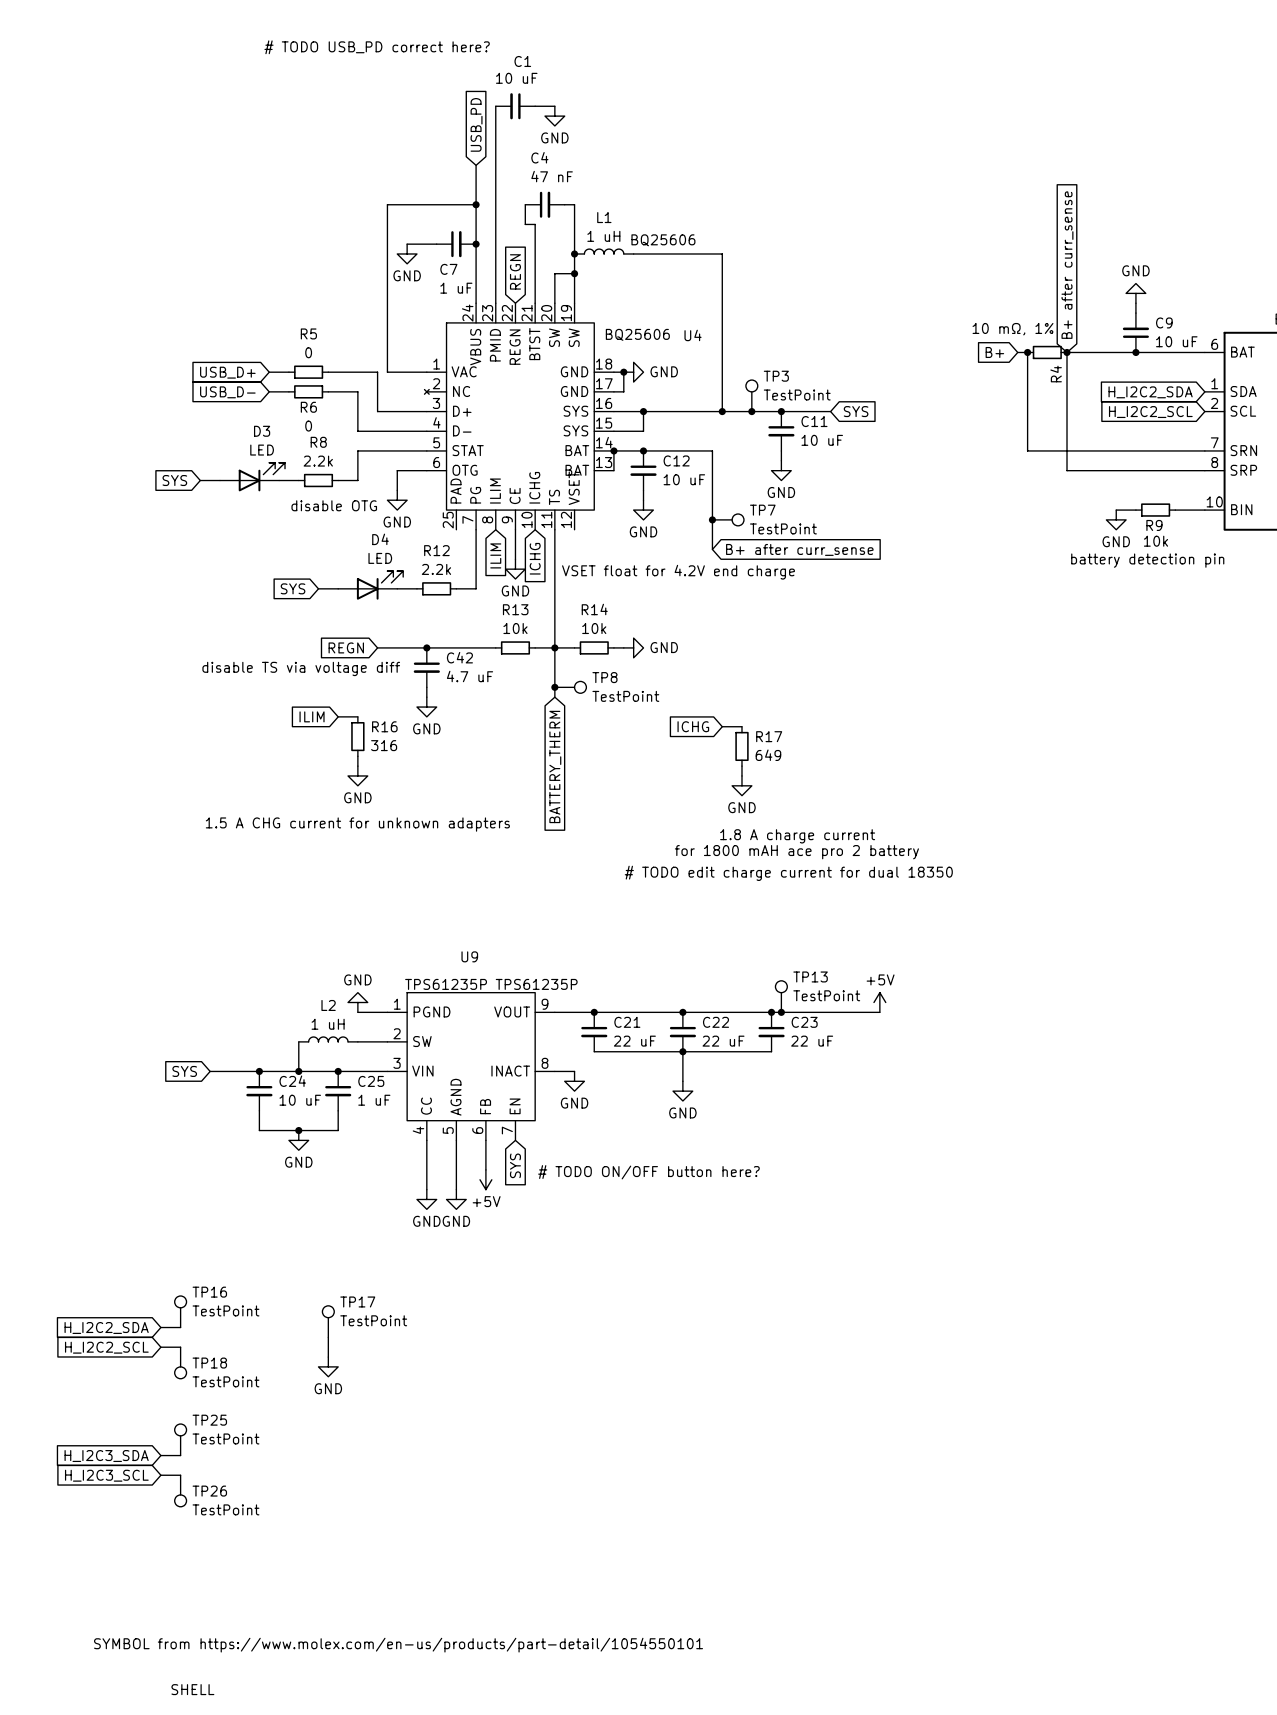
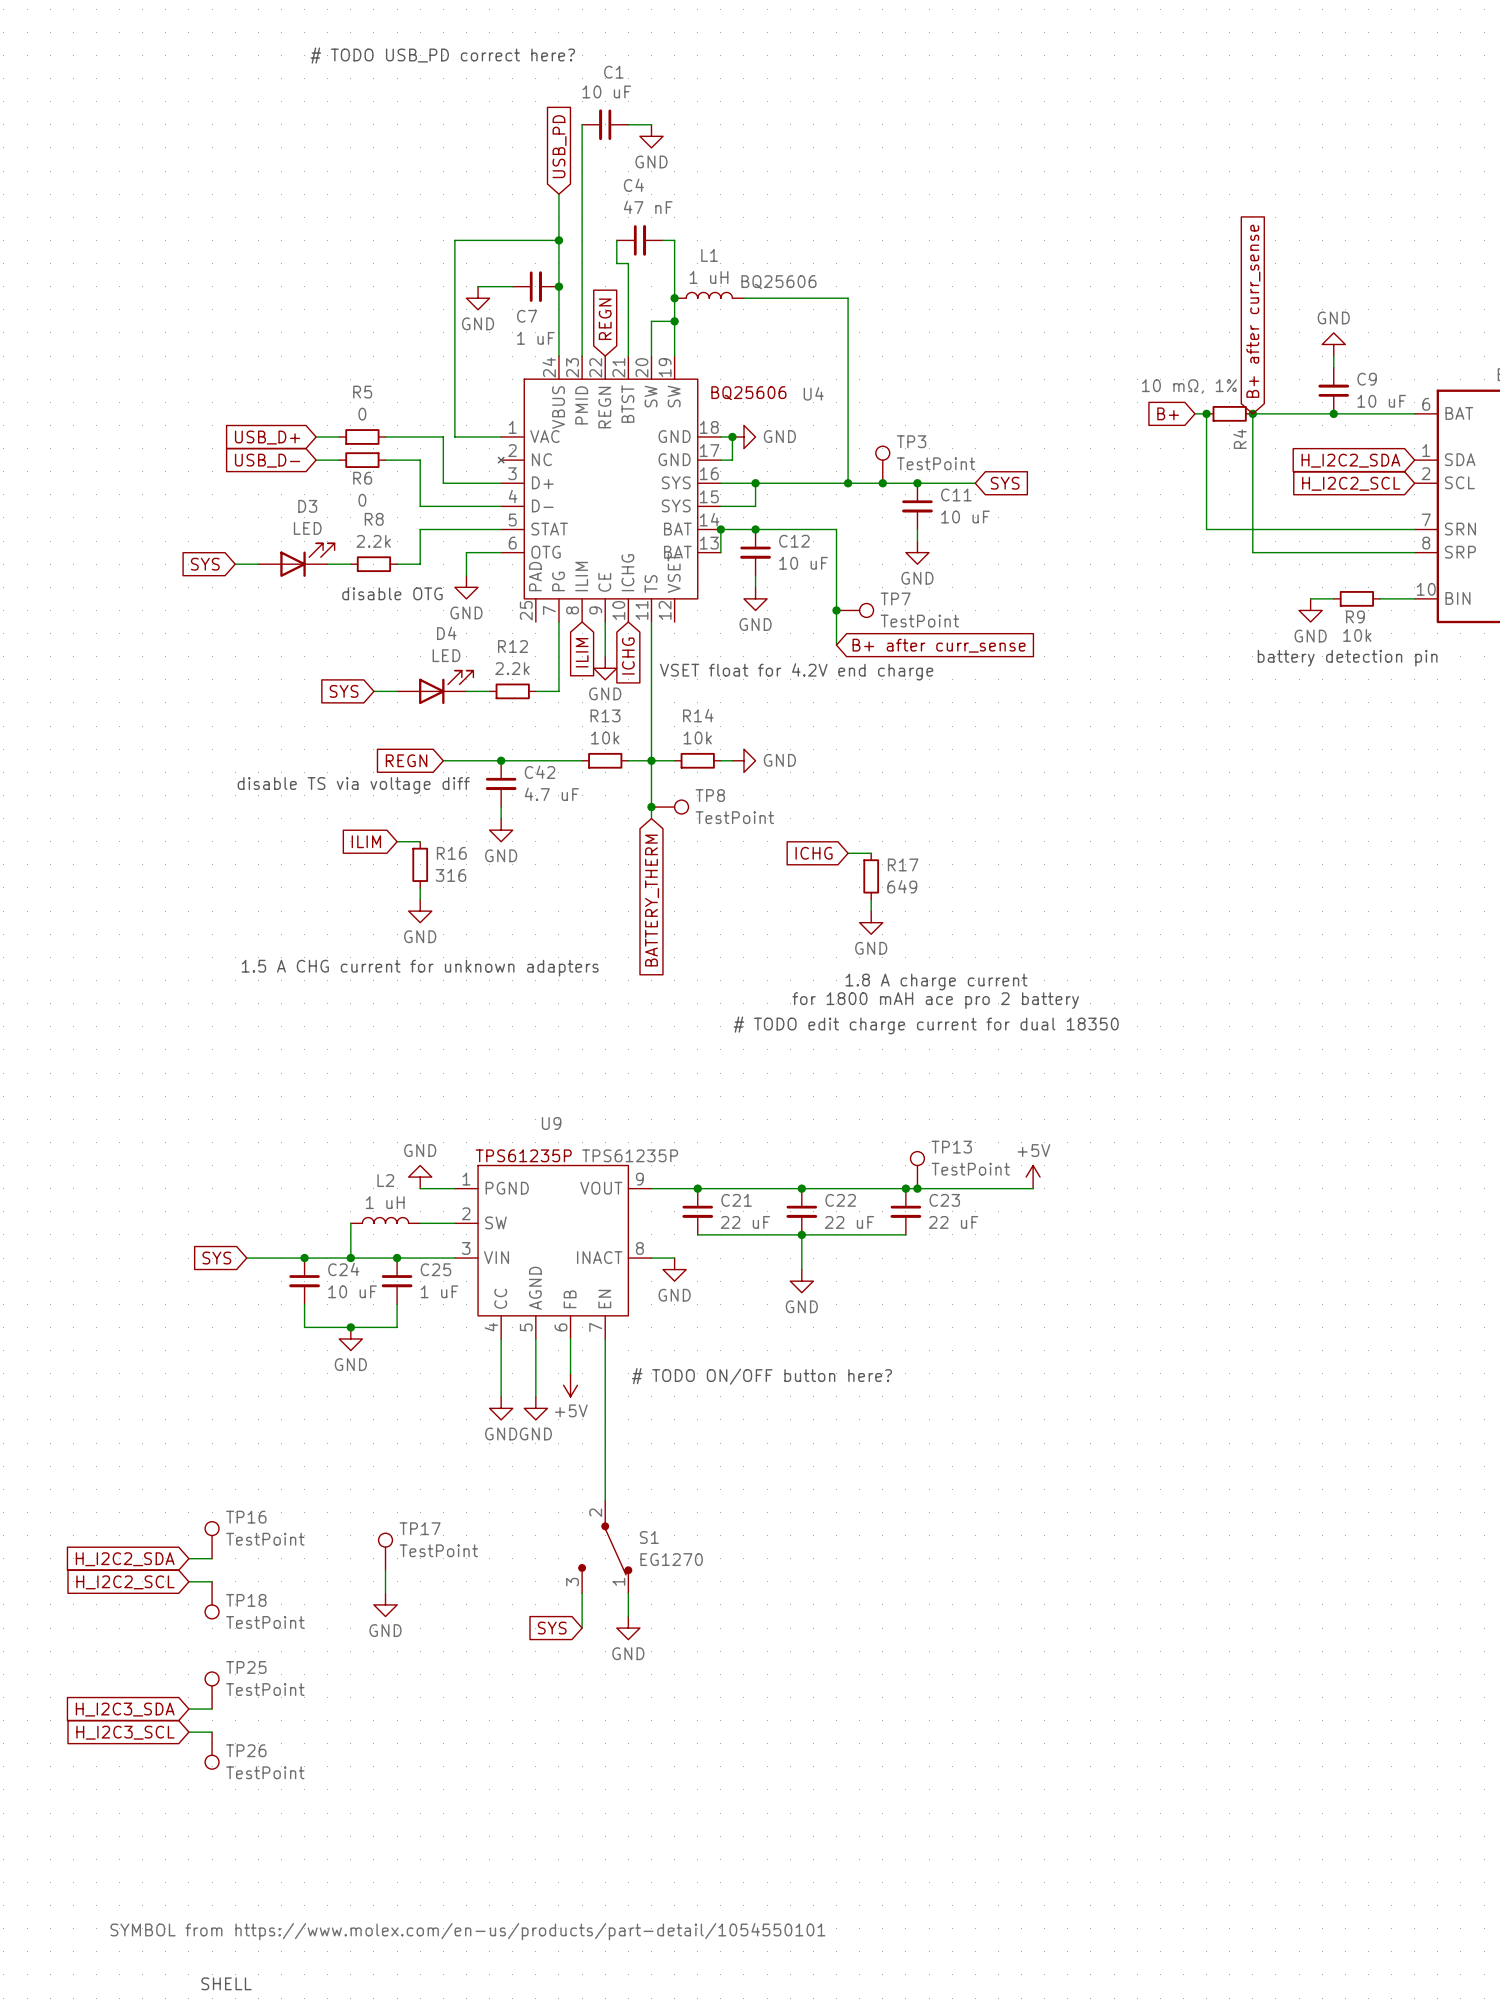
wire: none -> (605, 1338) (605, 1500)
global label: SYS (515, 1165) -> none
S1: none -> EG1270 (605, 1547)
wire: none -> (582, 1593) (582, 1628)
wire: none -> (628, 1593) (628, 1616)
global label: none -> SYS (552, 1628)
power symbol: none -> GND (628, 1628)

